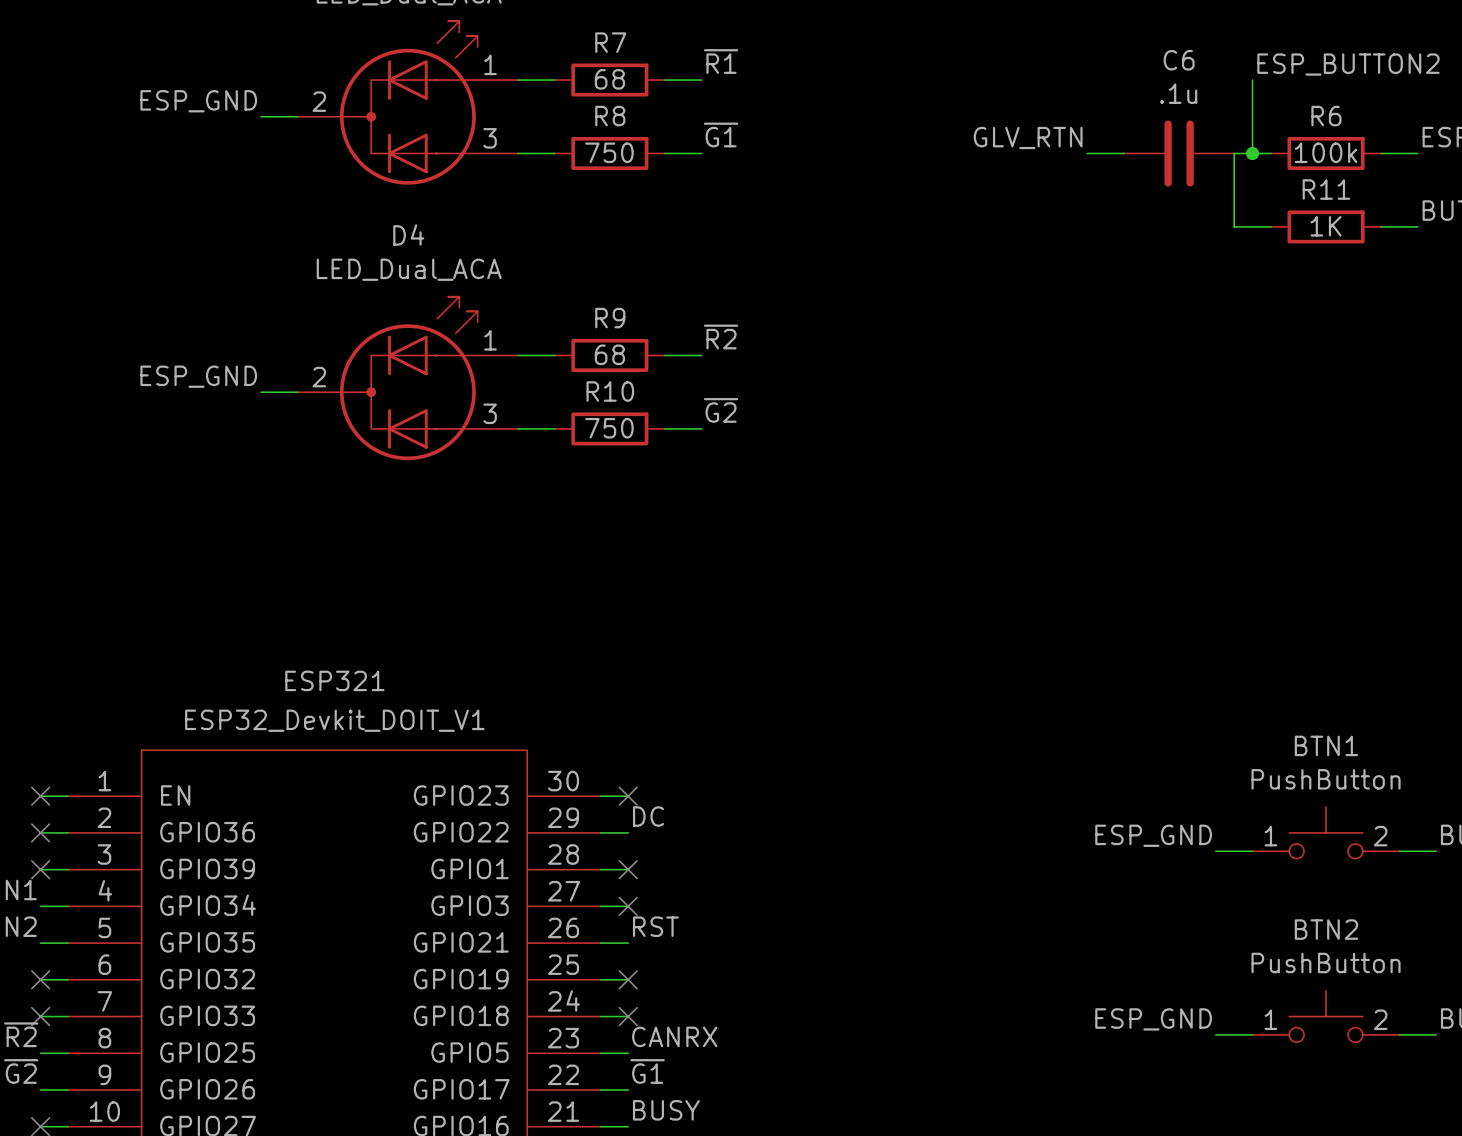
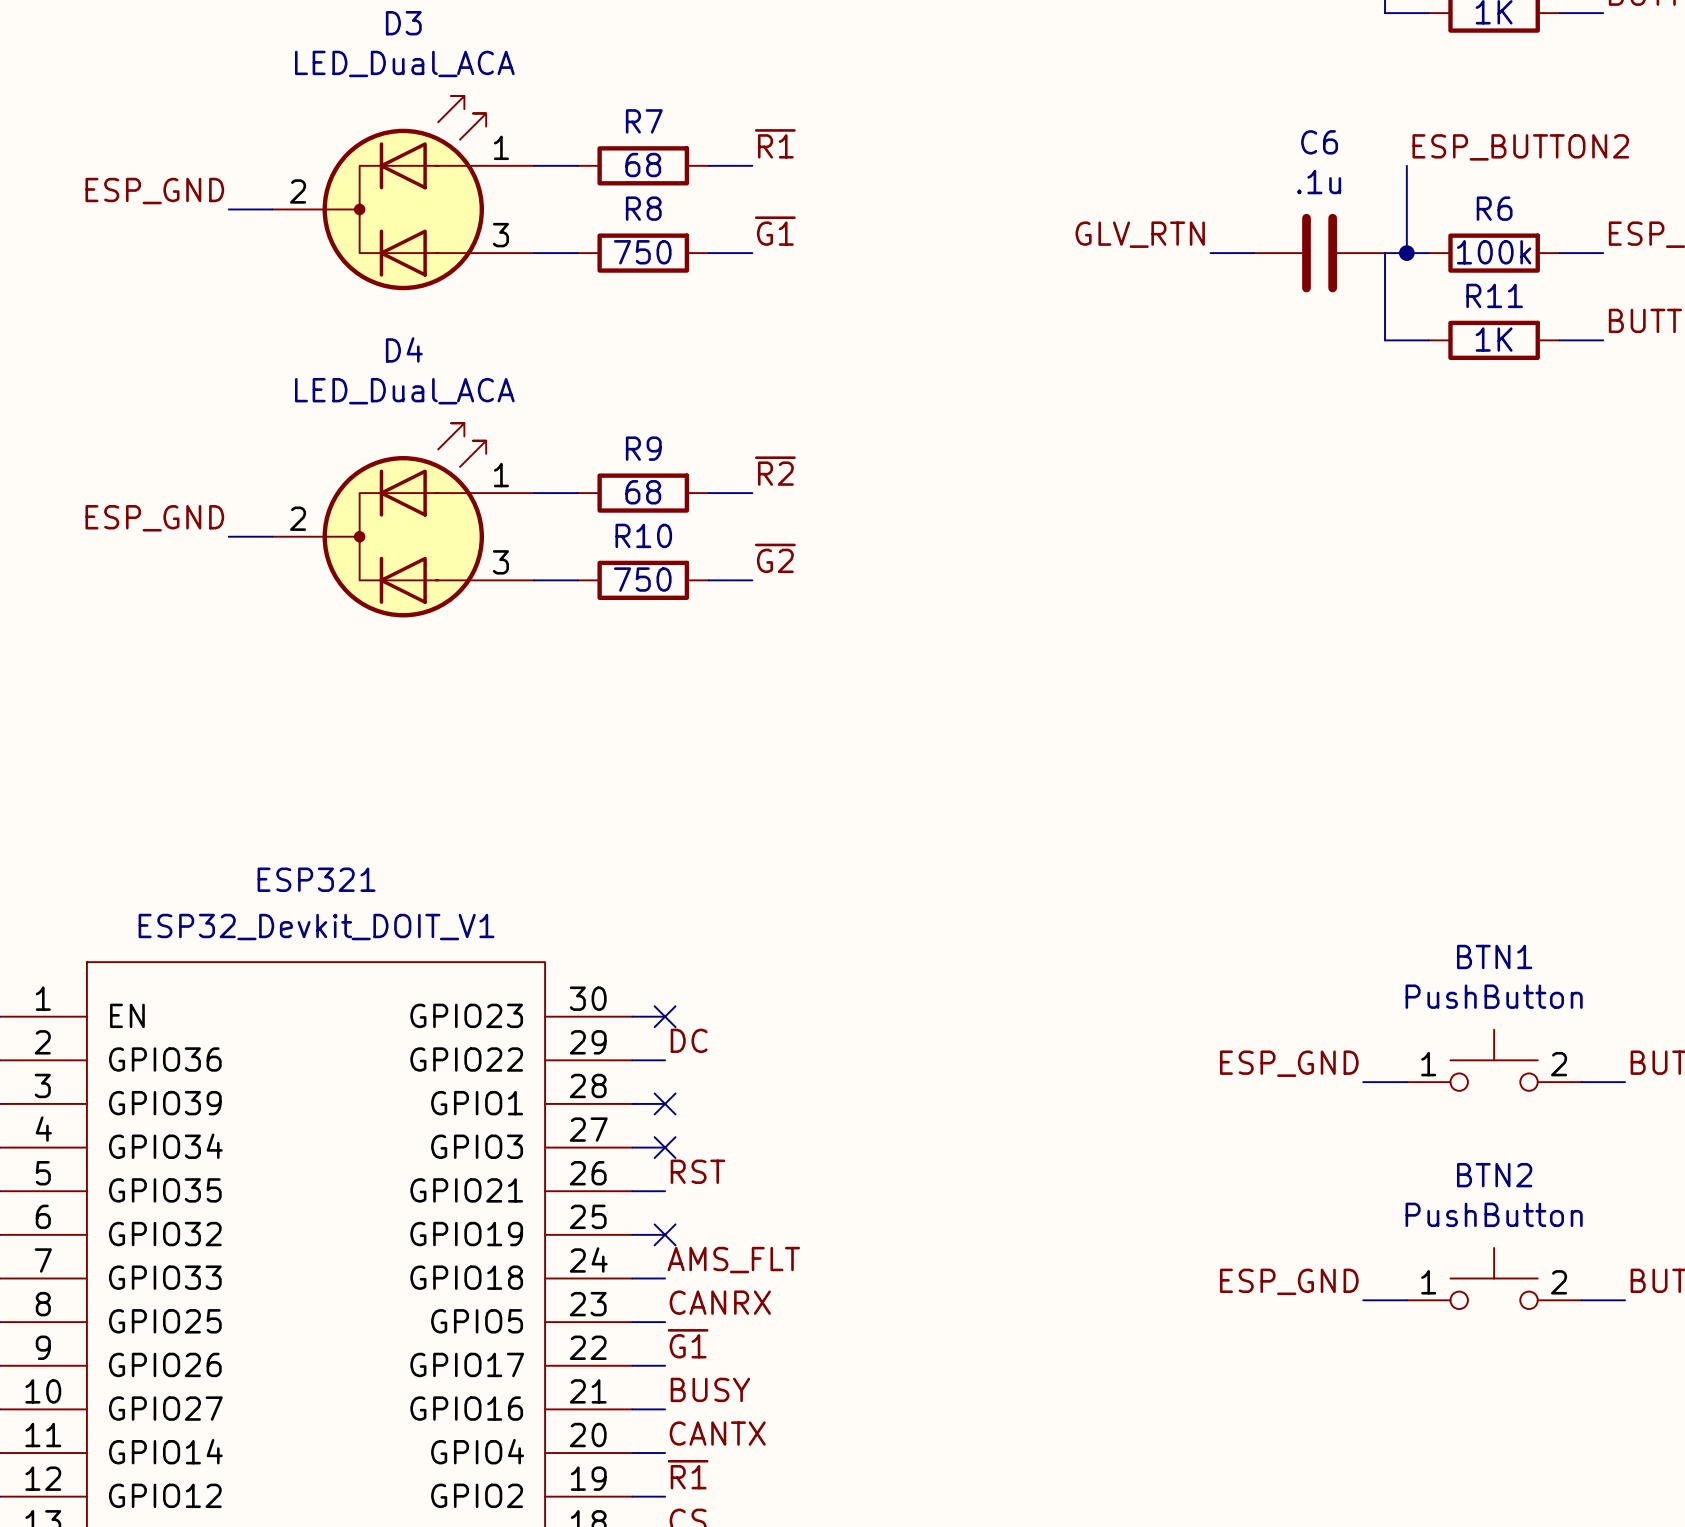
label: none -> AMS_FLT (733, 1260)
no-connect mark: (628, 1016) -> none

